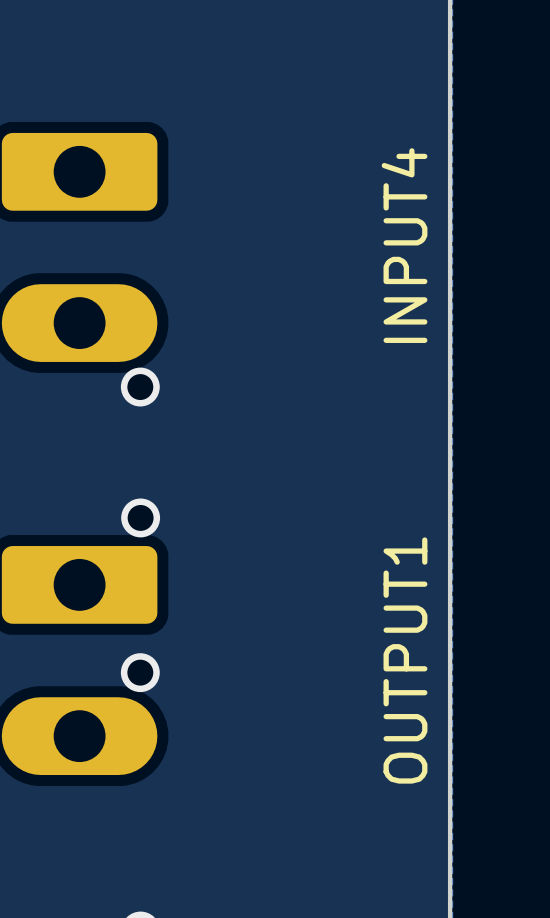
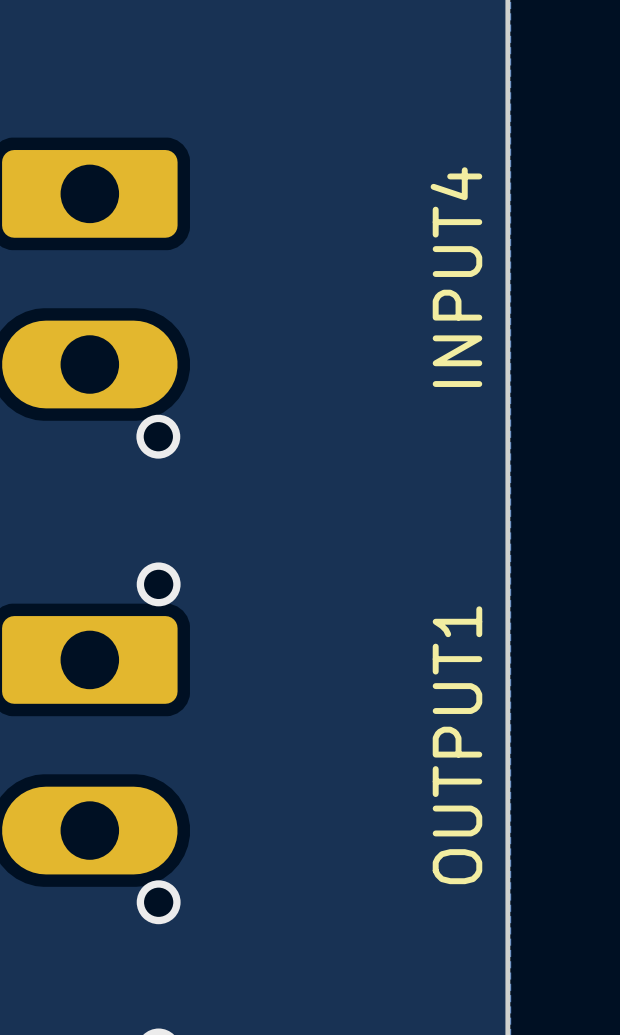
via: (140, 672) -> none
via: none -> (158, 902)

